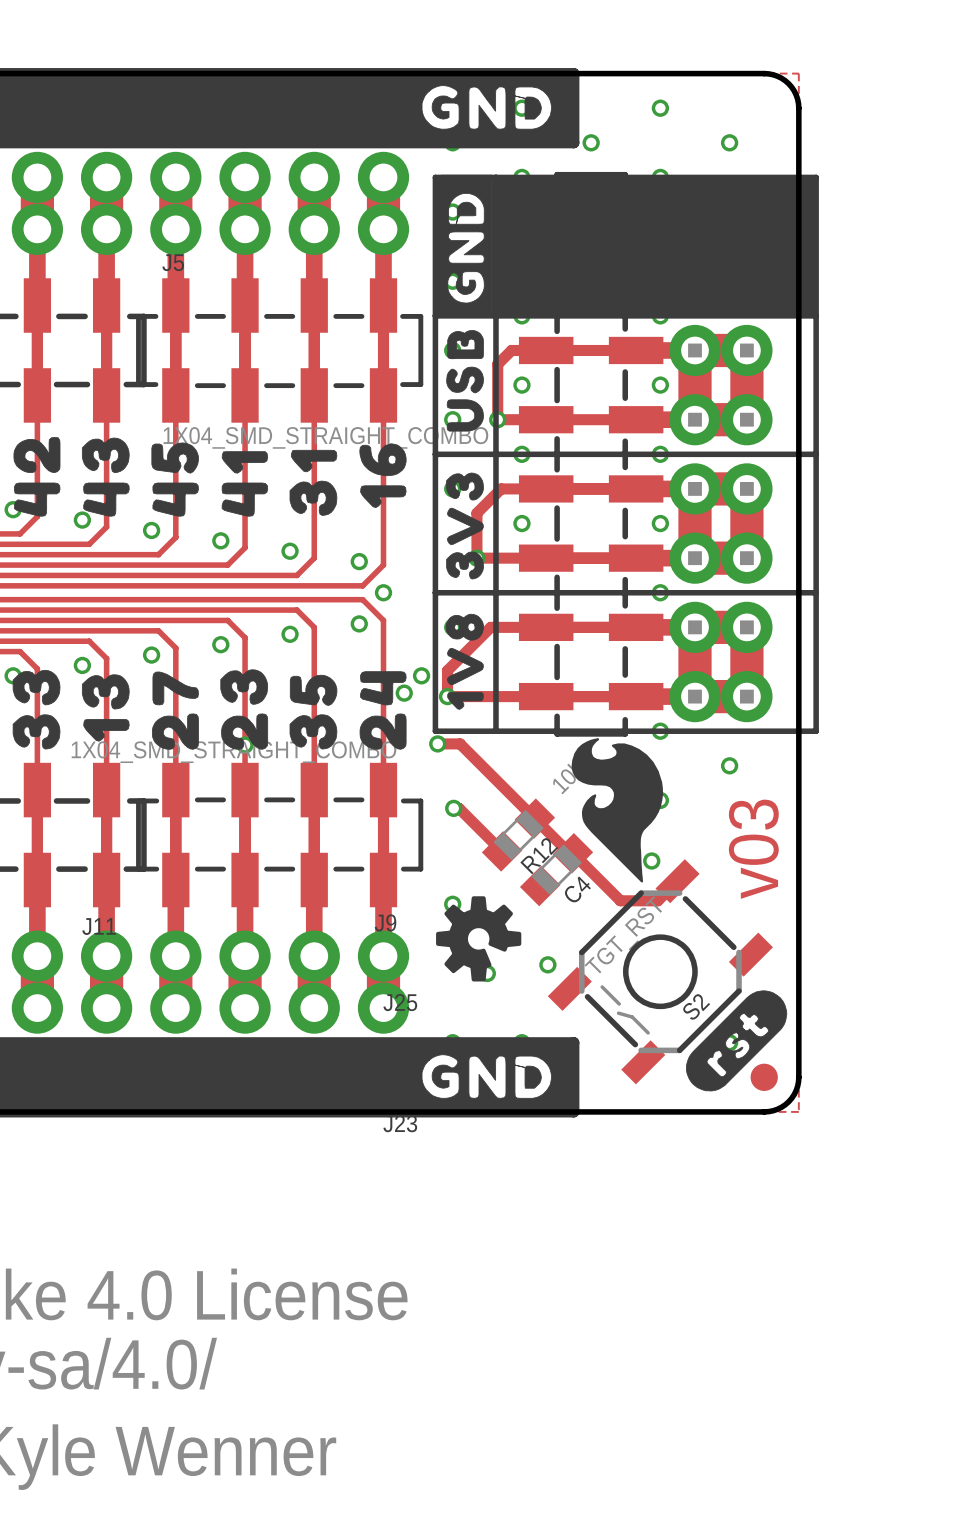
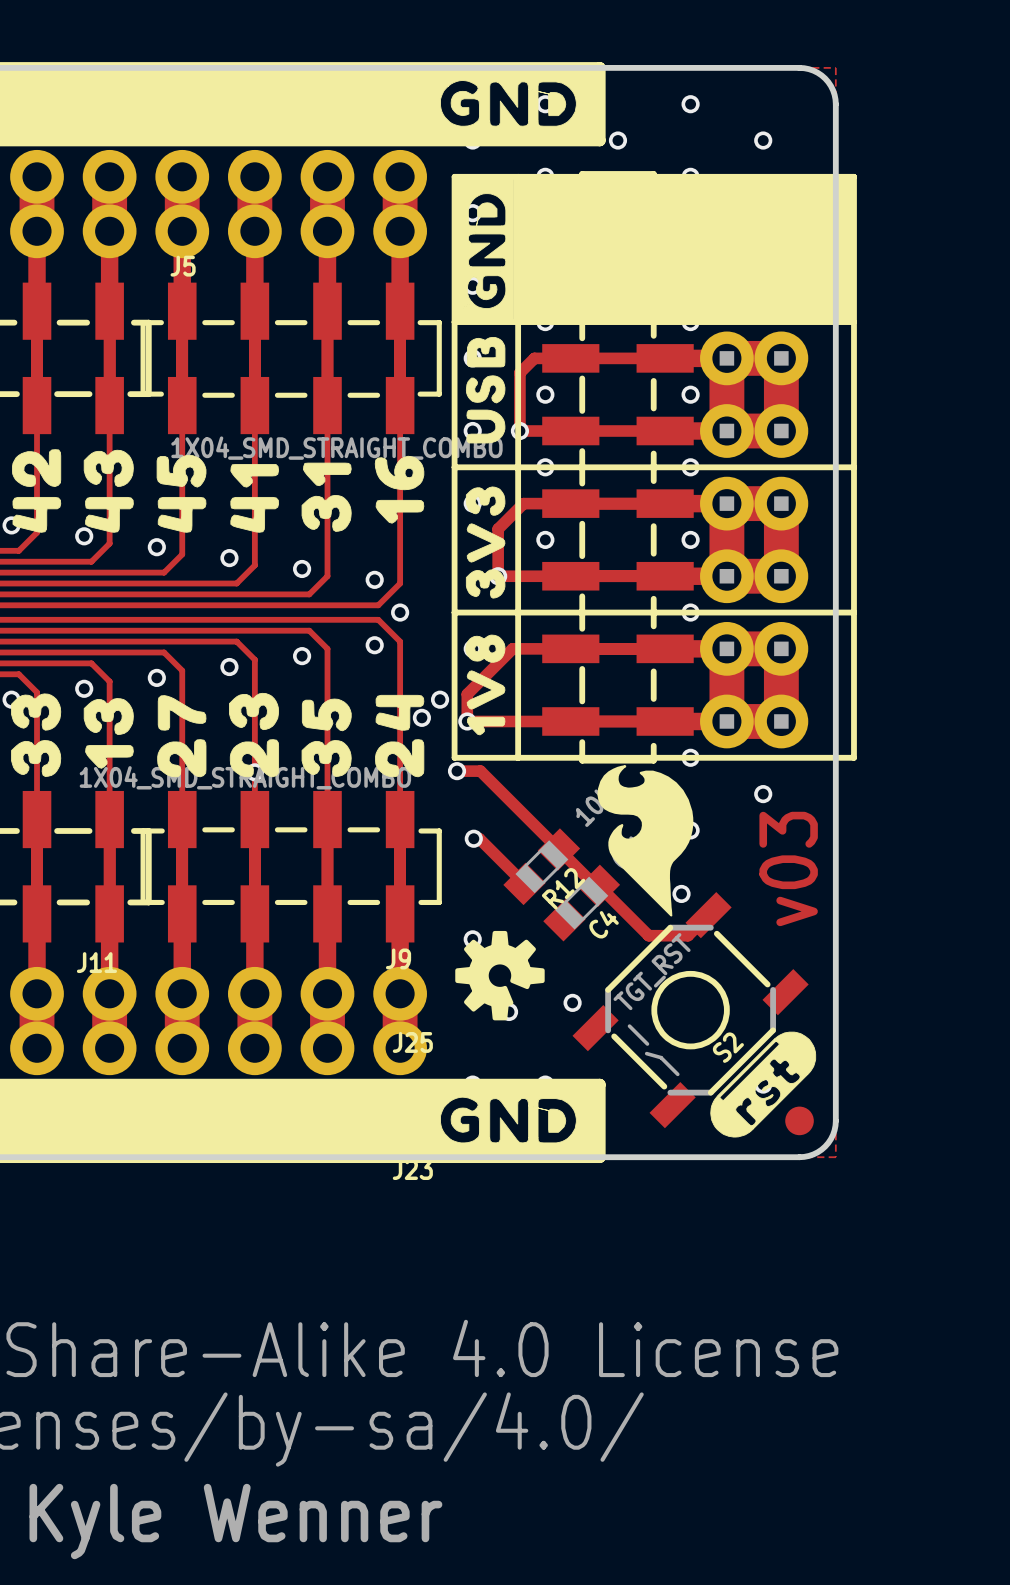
drawing shape: [686, 990, 788, 1092] -> [710, 1031, 817, 1138]

